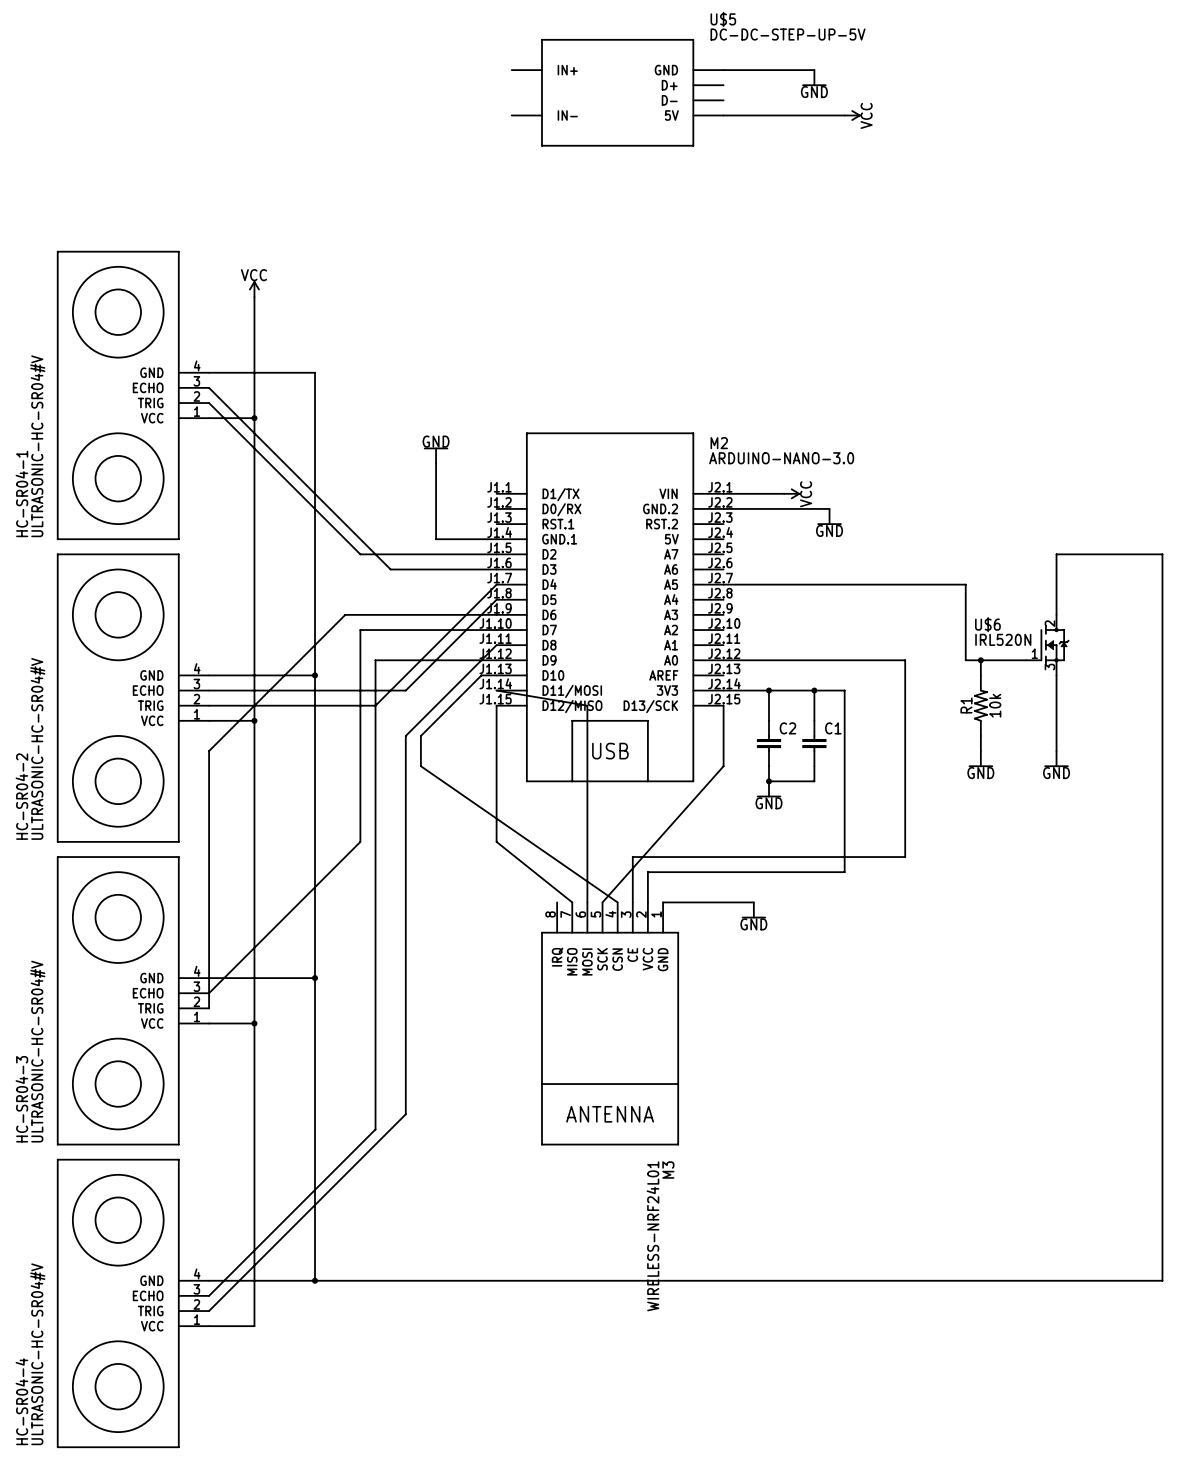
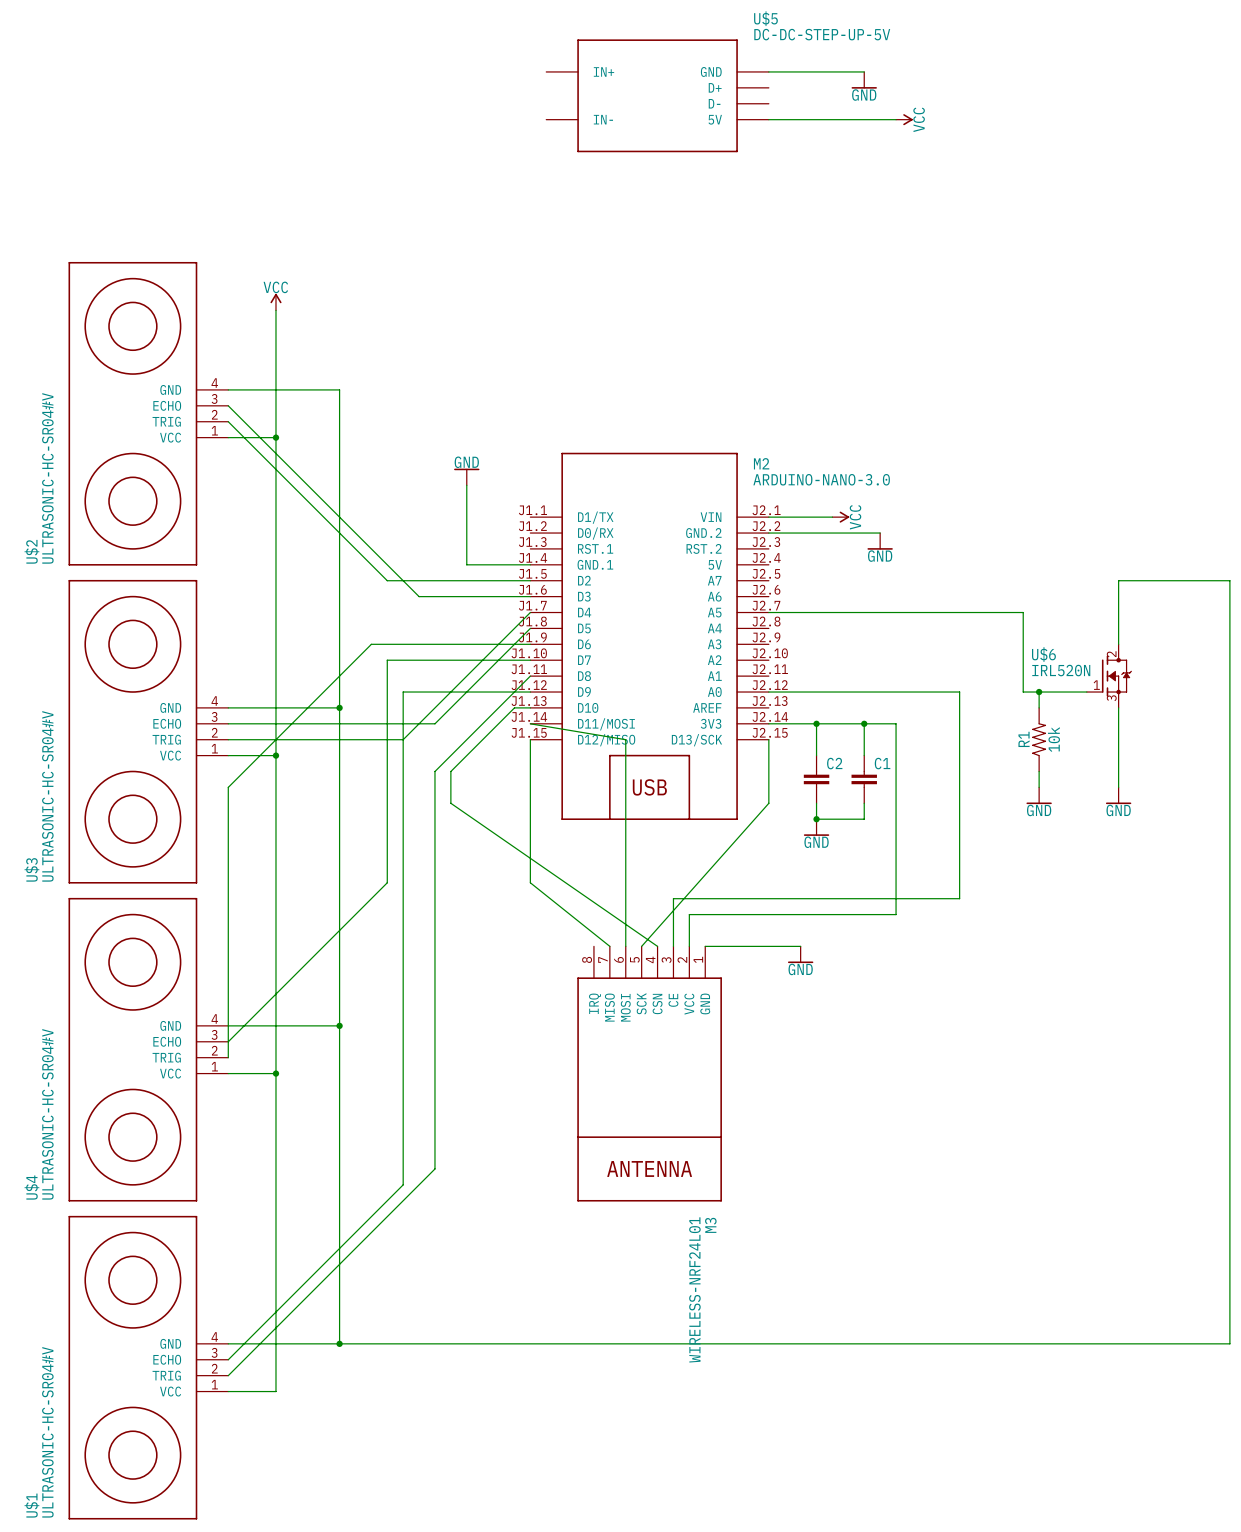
HC-SR04-1 name: HC-SR04-1 (21, 493) -> U$2 (31, 551)
HC-SR04-2 name: HC-SR04-2 (21, 796) -> U$3 (31, 869)
HC-SR04-3 name: HC-SR04-3 (21, 1099) -> U$4 (31, 1187)
HC-SR04-4 name: HC-SR04-4 (21, 1401) -> U$1 (31, 1505)

